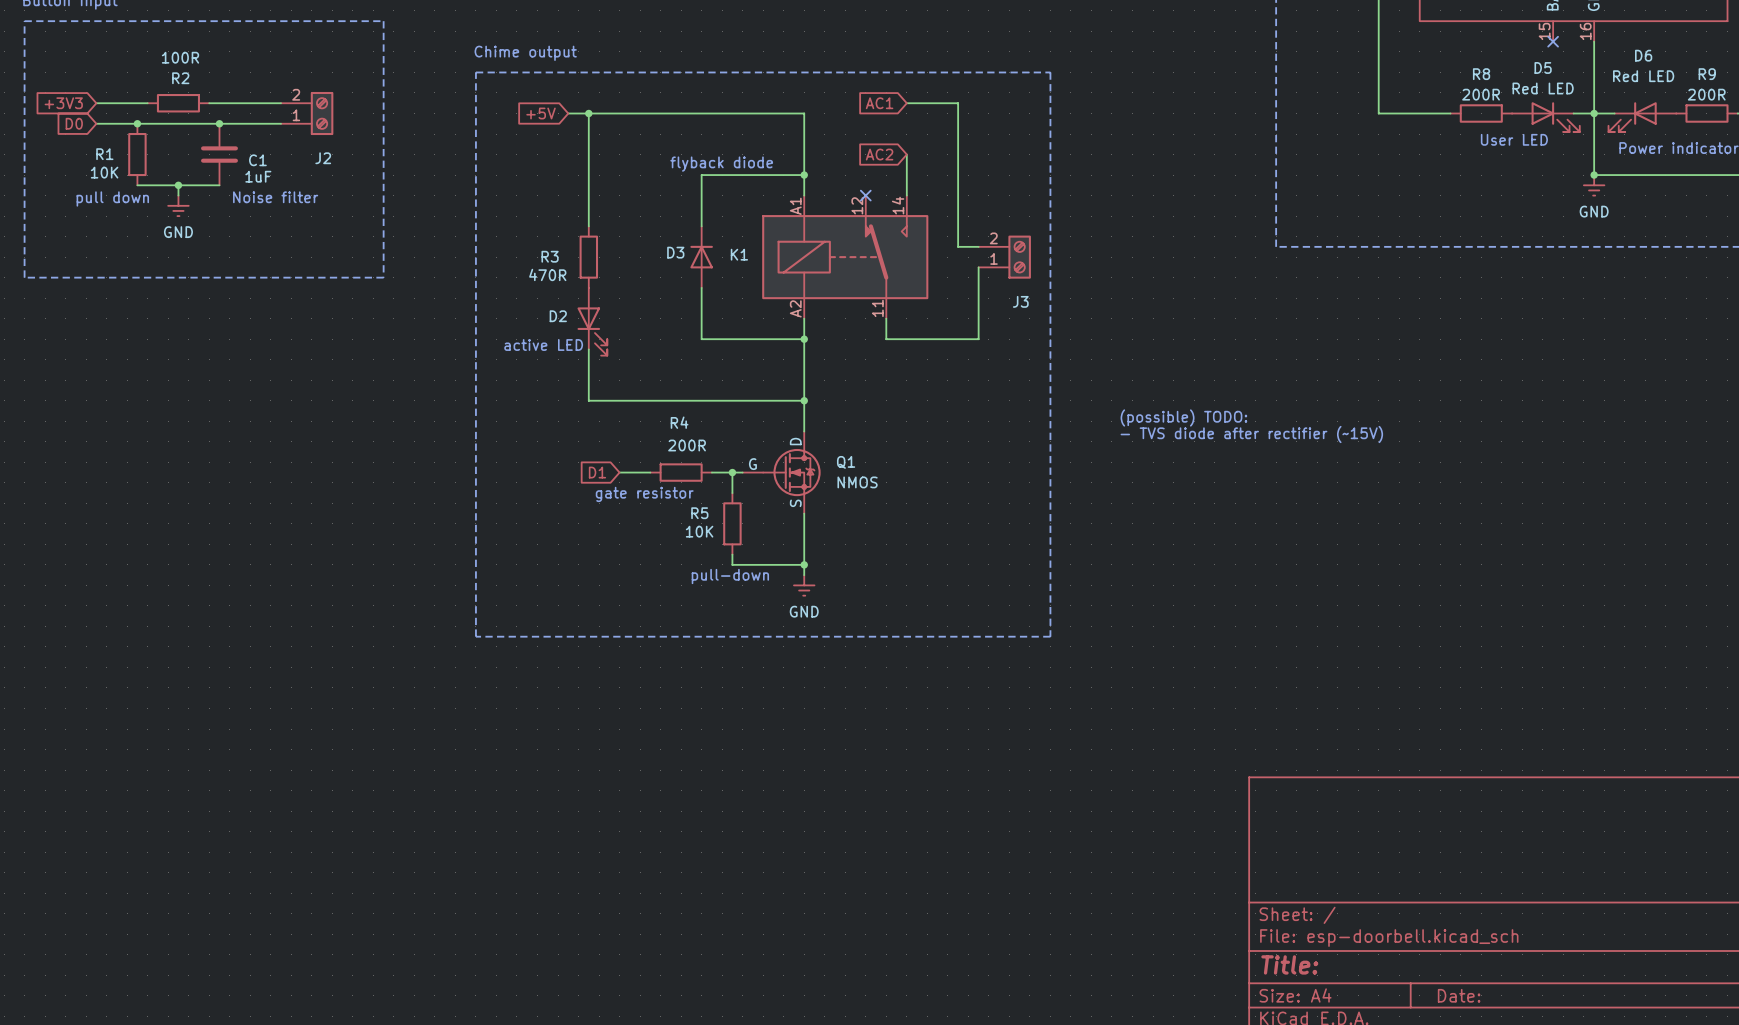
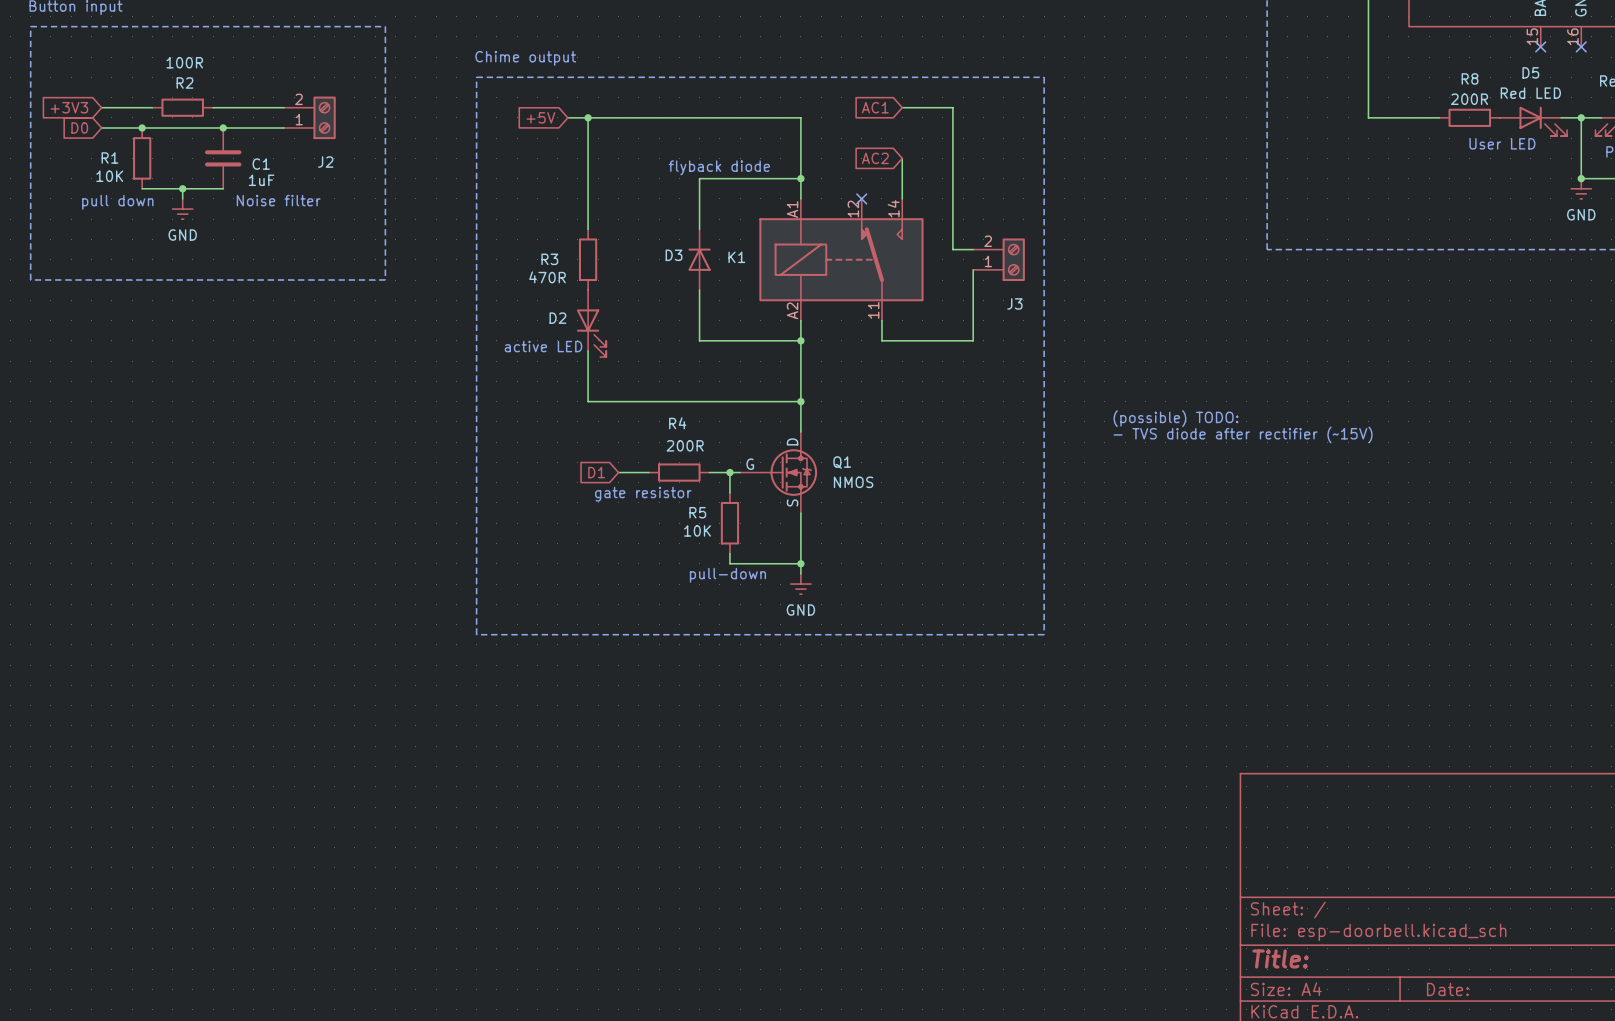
wire: (1594, 41) (1594, 113) -> none
no-connect mark: none -> (1581, 46)

